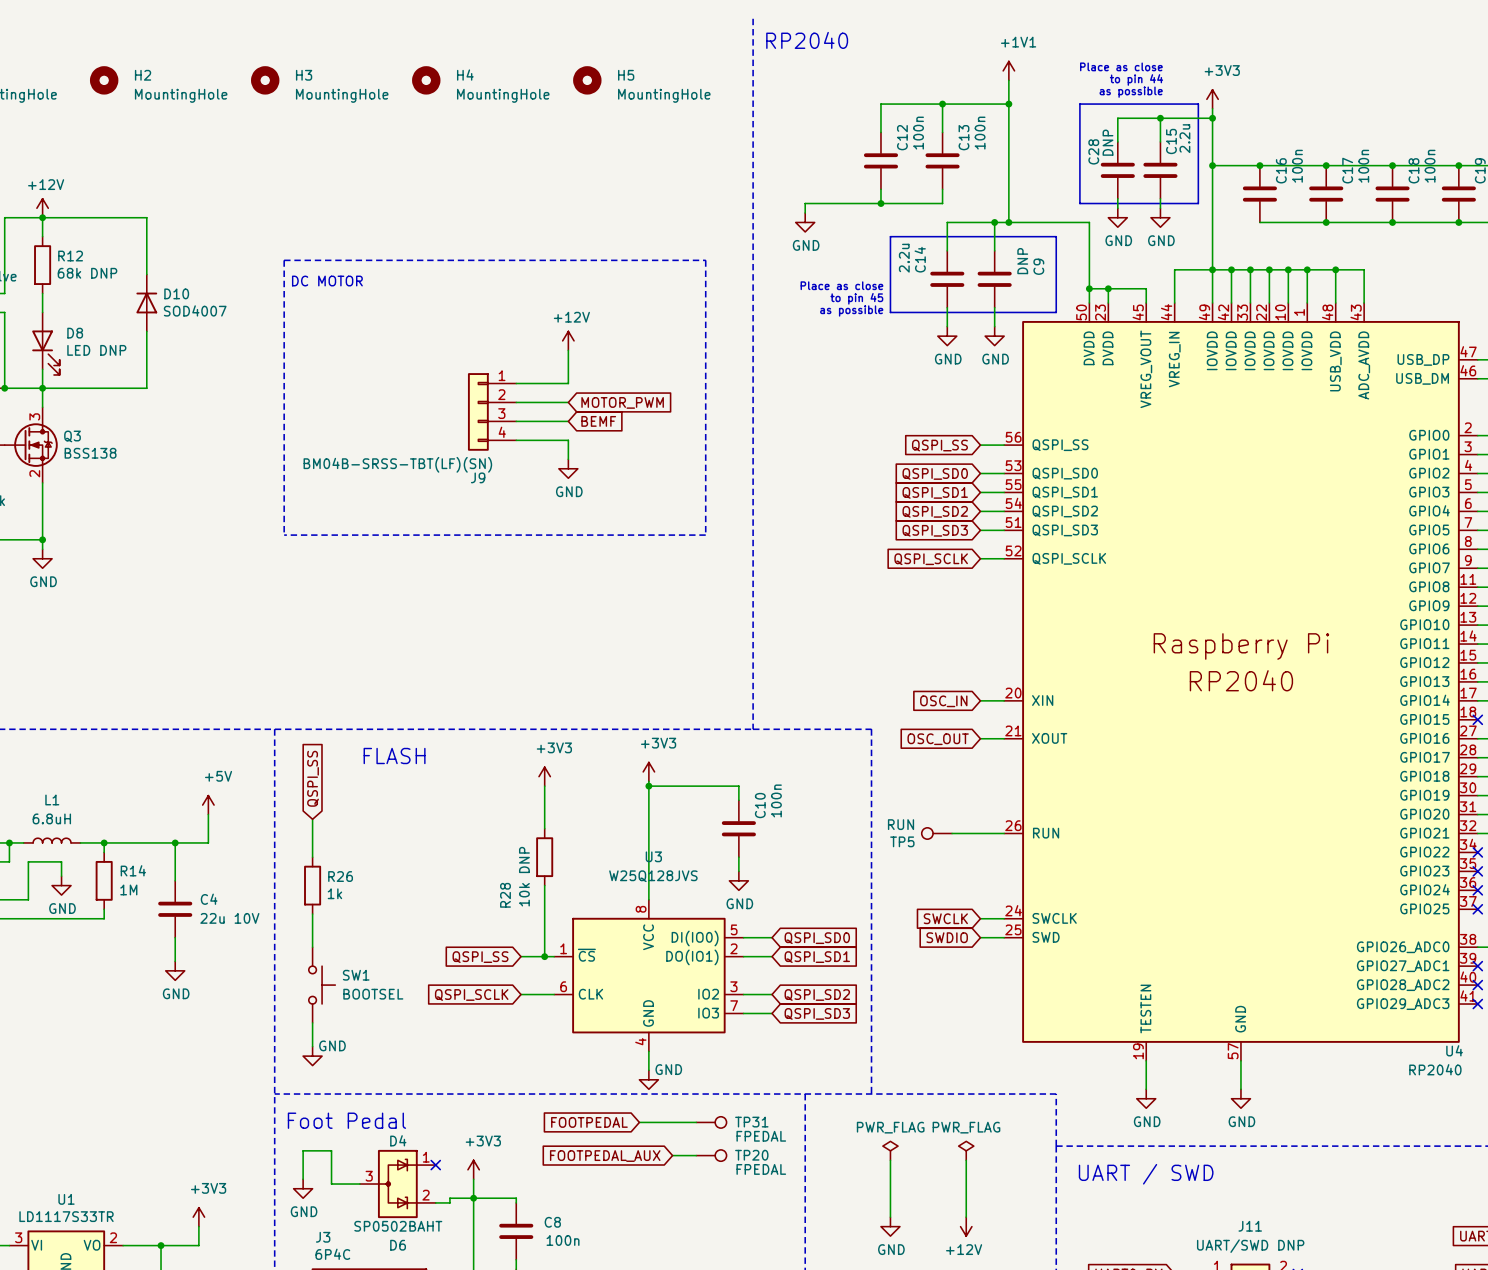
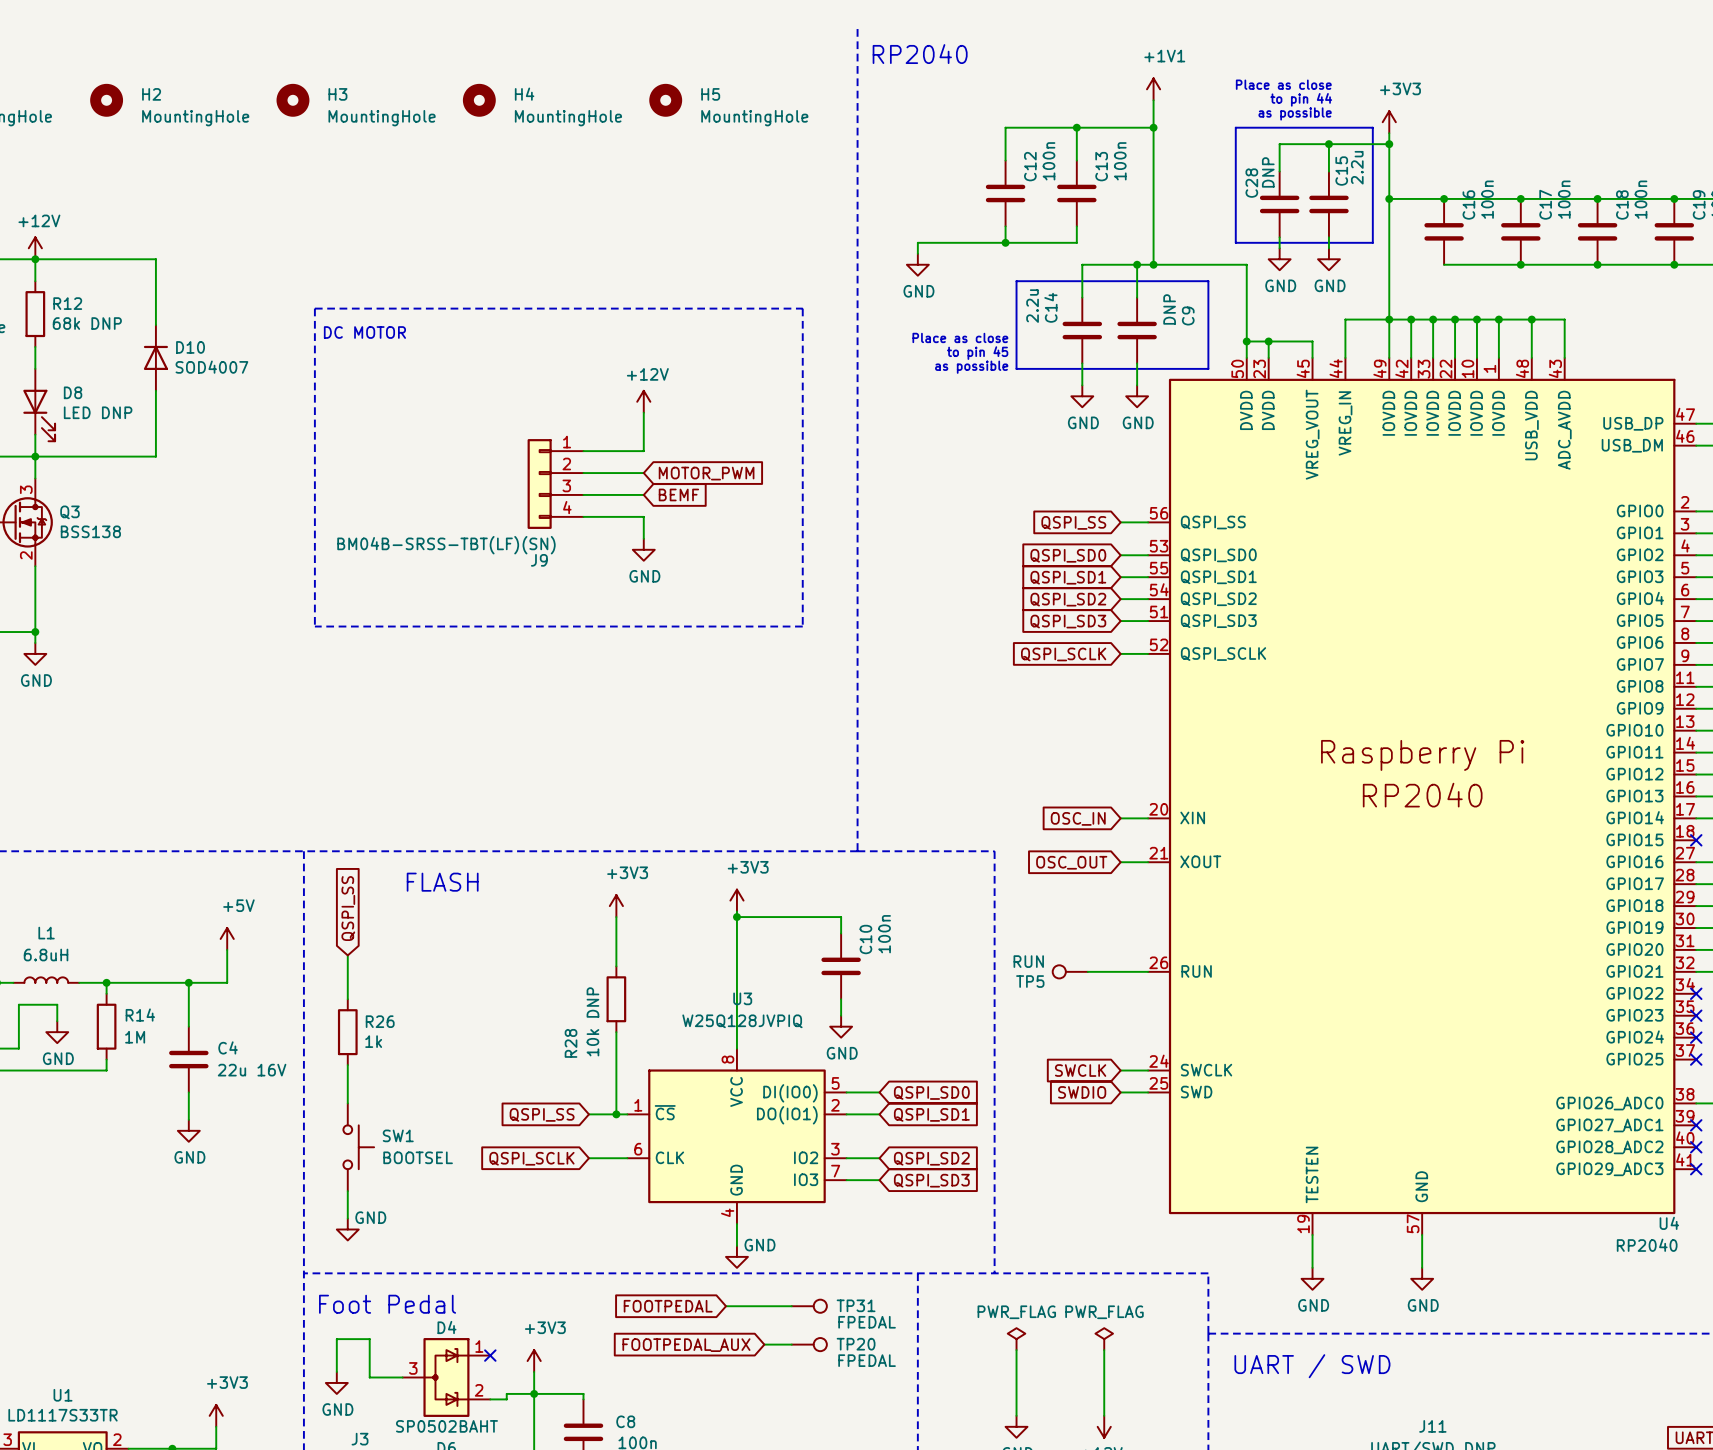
U3 value: W25Q128JVS (653, 876) -> W25Q128JVPIQ (742, 1021)
C4 value: 22u 10V (229, 918) -> 22u 16V (252, 1070)

